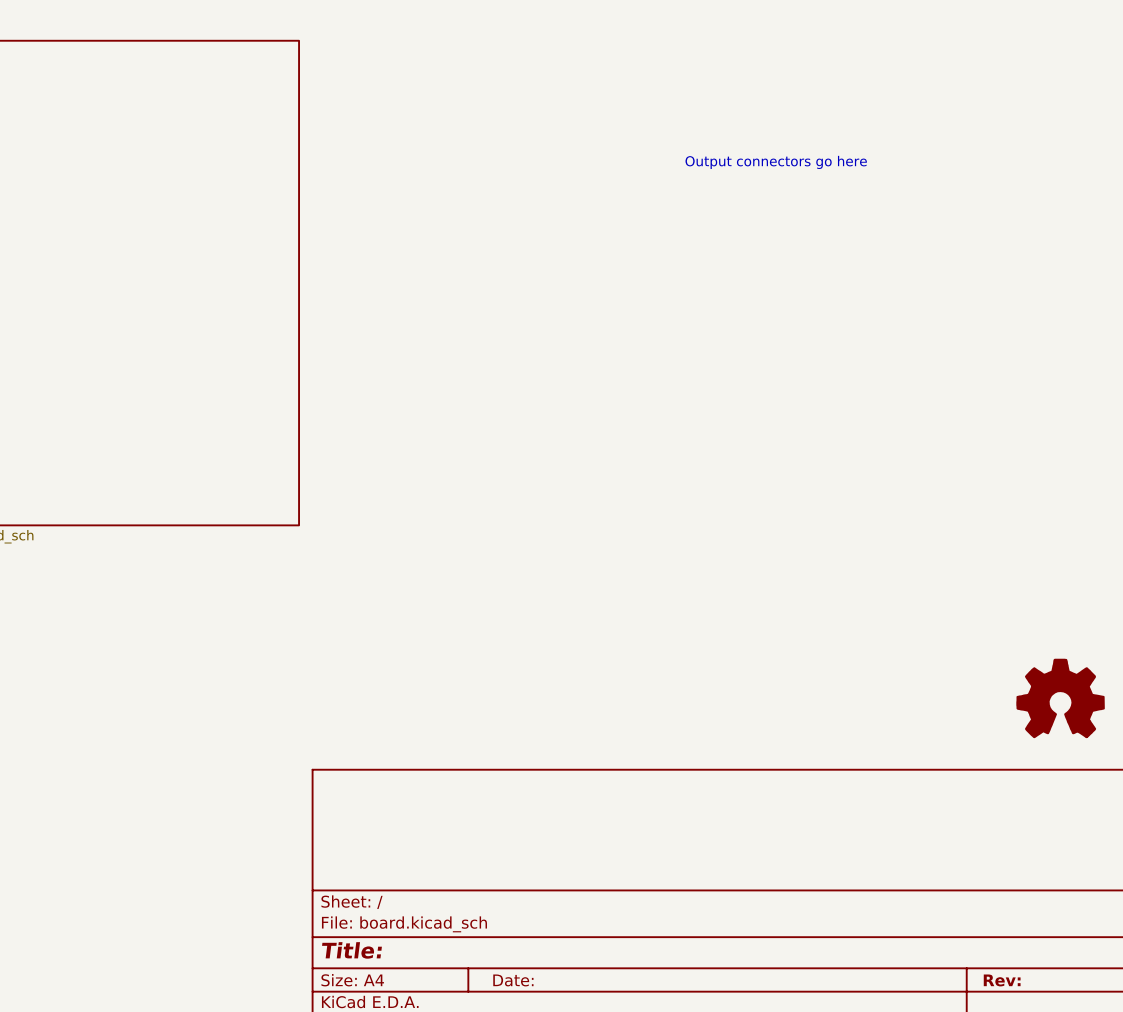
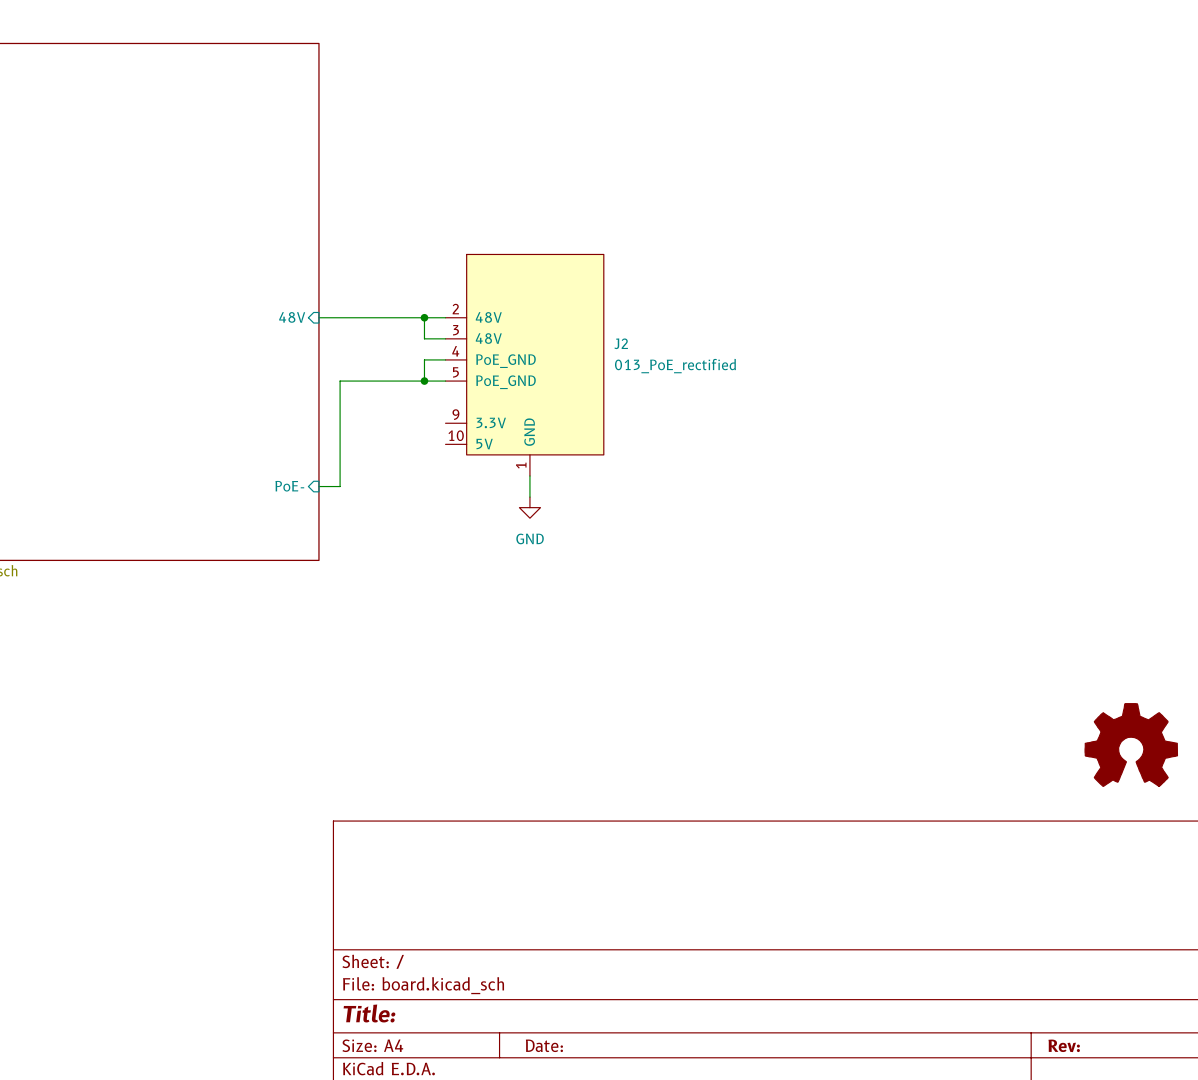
text: Output connectors go here (776, 162) -> none
sheet pin: none -> 48V (292, 317)
wire: none -> (318, 317) (445, 317)
wire: none -> (424, 317) (424, 338) (445, 338)
junction: none -> (424, 317)
wire: none -> (445, 359) (424, 359) (424, 381)
J2: none -> 013_PoE_rectified (524, 365)
junction: none -> (424, 381)
wire: none -> (445, 381) (340, 381) (340, 486) (318, 486)
wire: none -> (529, 475) (529, 497)
sheet pin: none -> PoE- (289, 486)
power symbol: none -> GND (529, 507)

